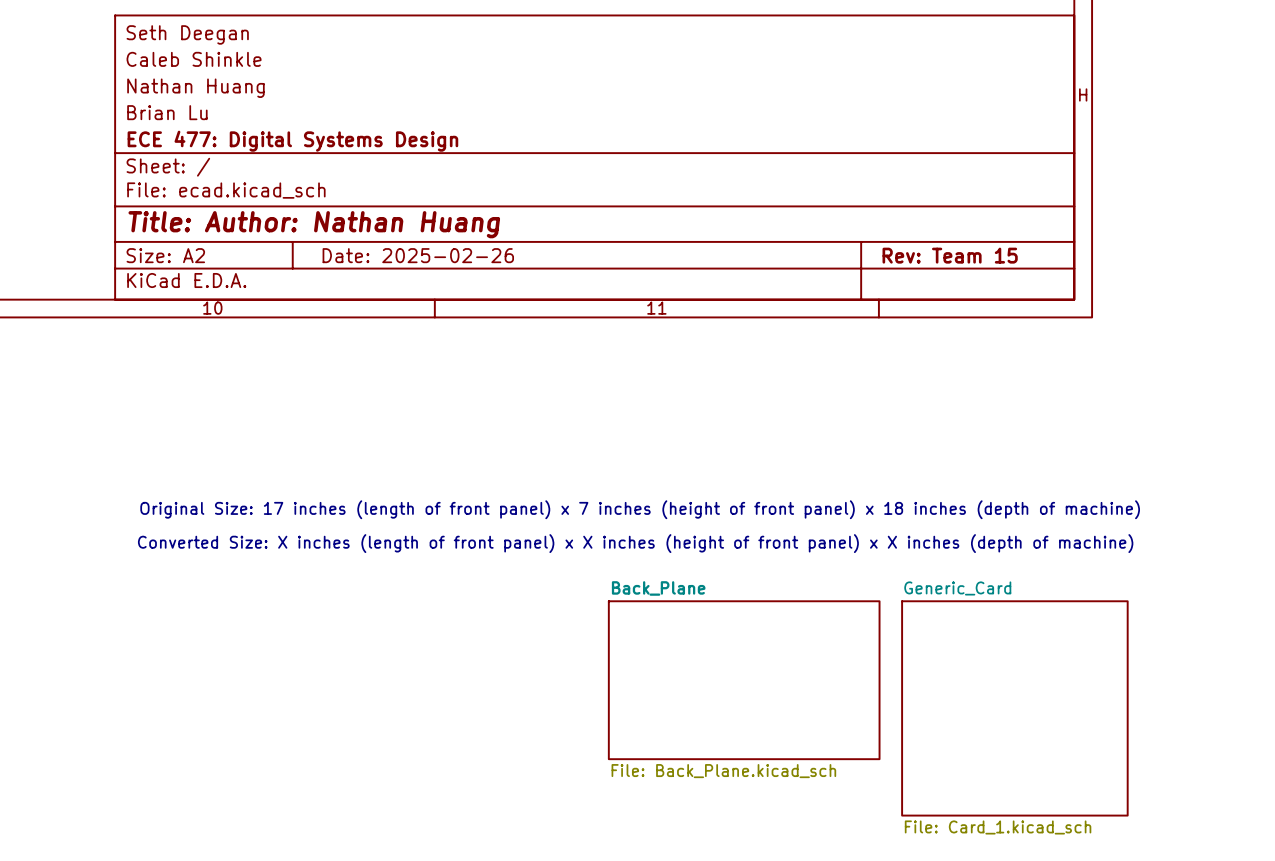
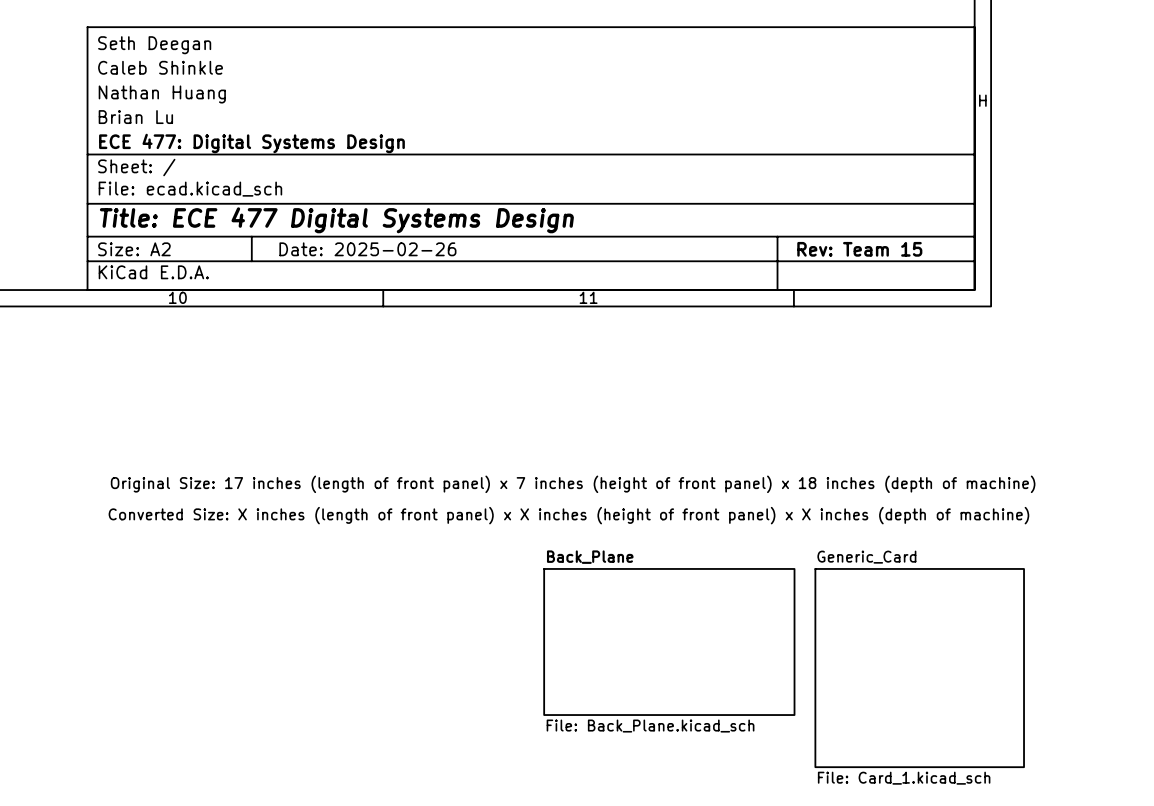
title block: Title: Author: Nathan Huang (314, 224) -> Title: ECE 477 Digital Systems Design (336, 220)

